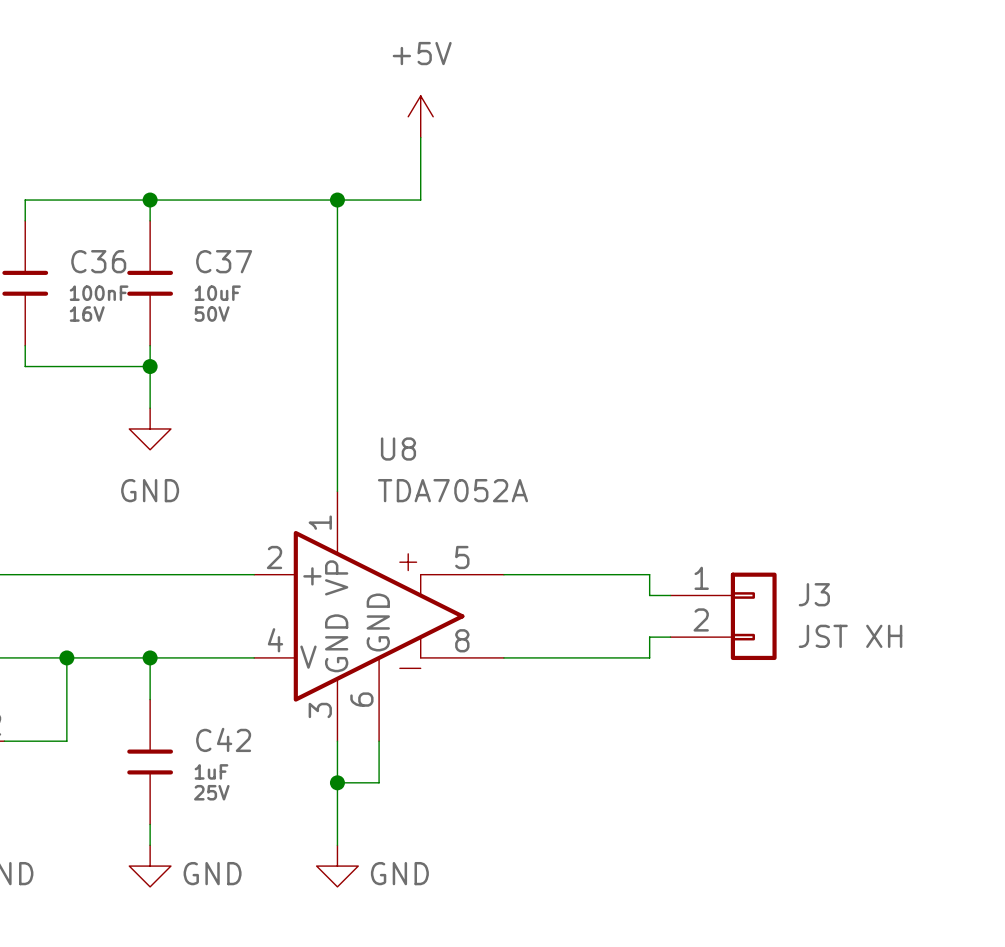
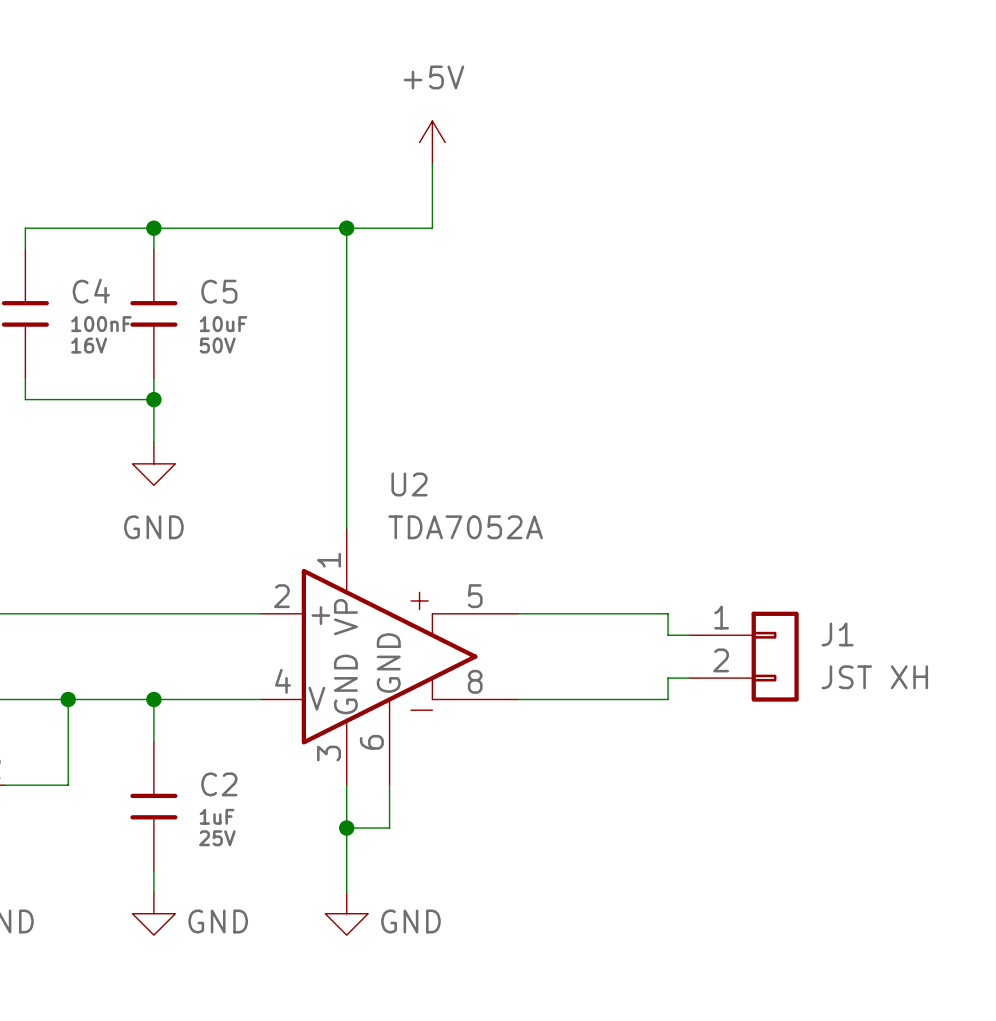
C36 name: C36 (98, 261) -> C4 (91, 291)
C37 name: C37 (224, 261) -> C5 (219, 291)
U8 name: U8 (398, 449) -> U2 (409, 484)
J3 name: J3 (814, 594) -> J1 (837, 634)
C42 name: C42 (223, 739) -> C2 (219, 784)

